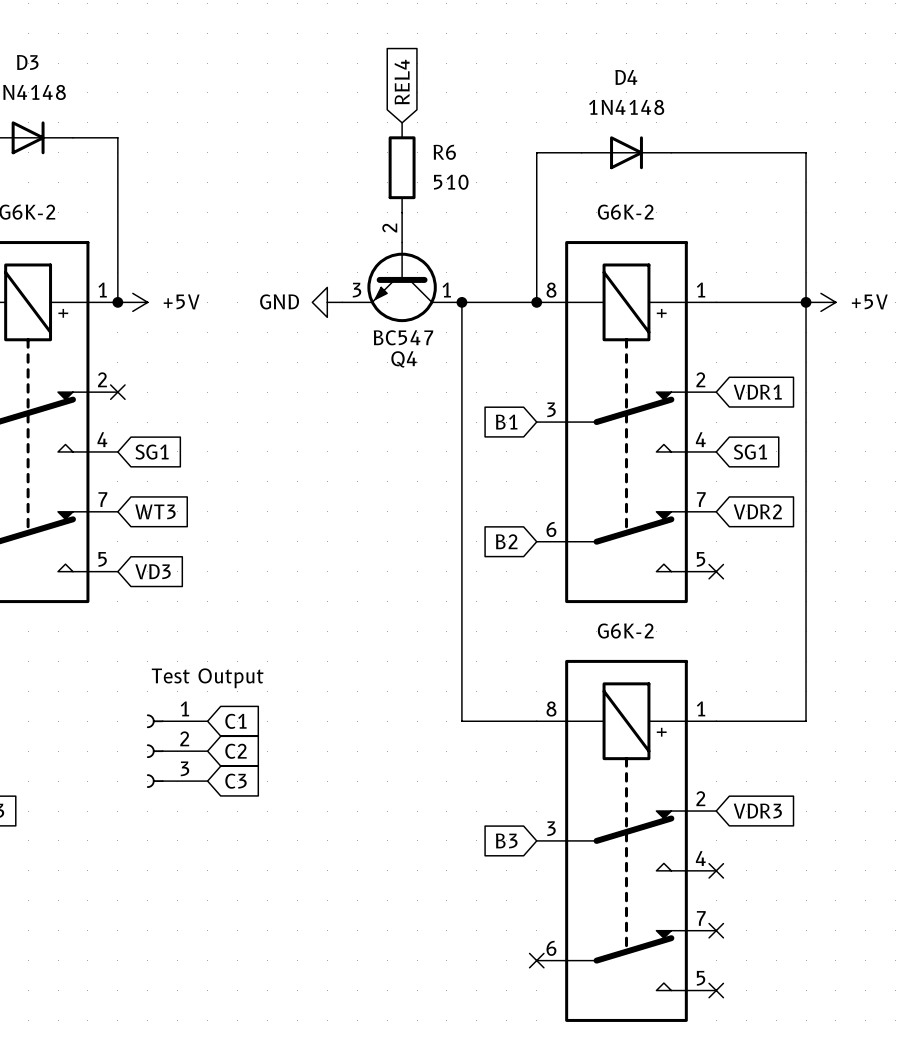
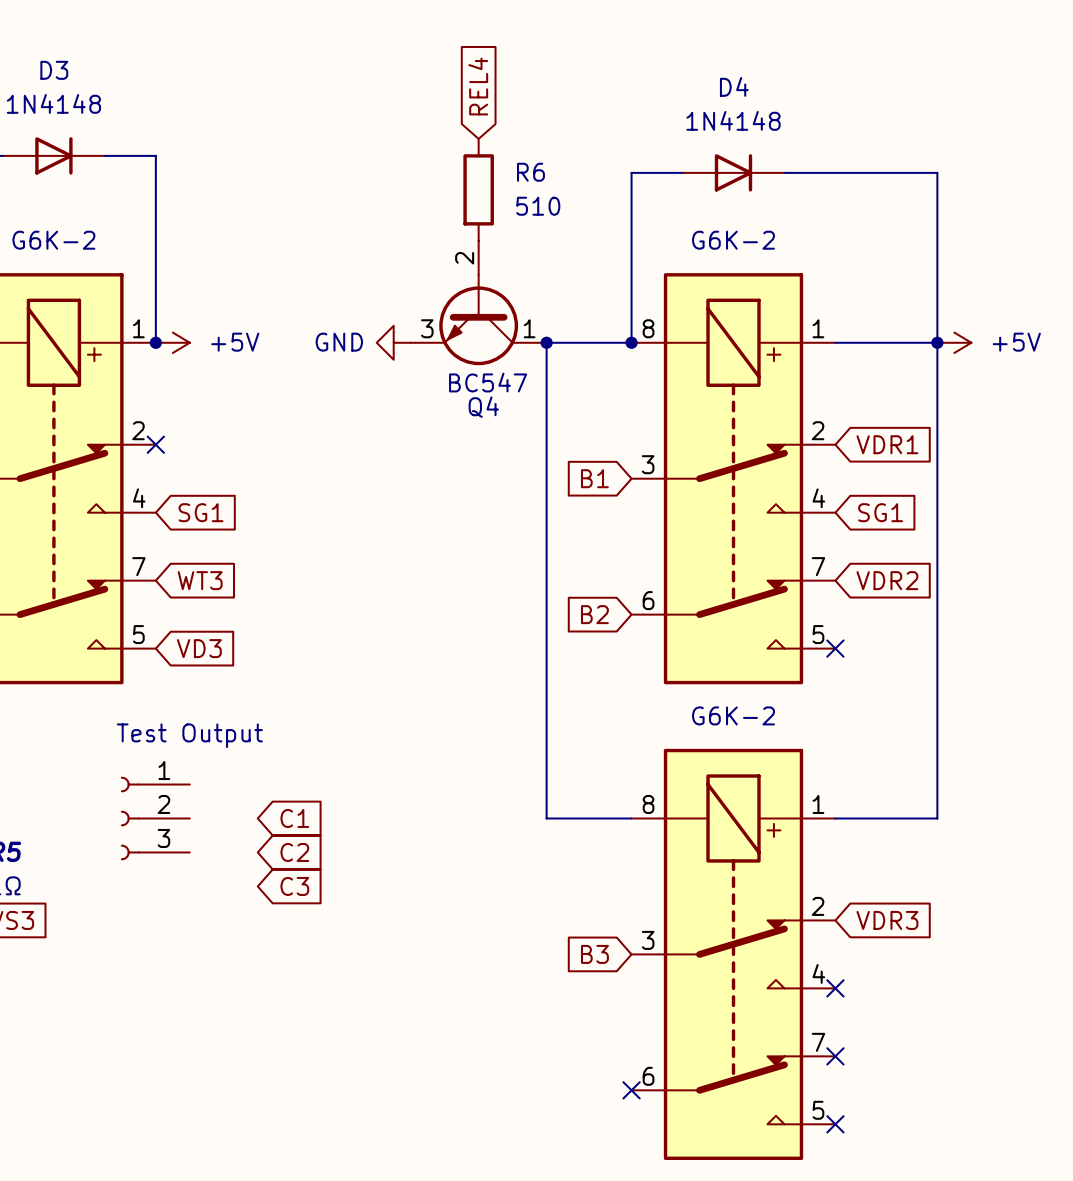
part position: (177, 751) -> (155, 818)

